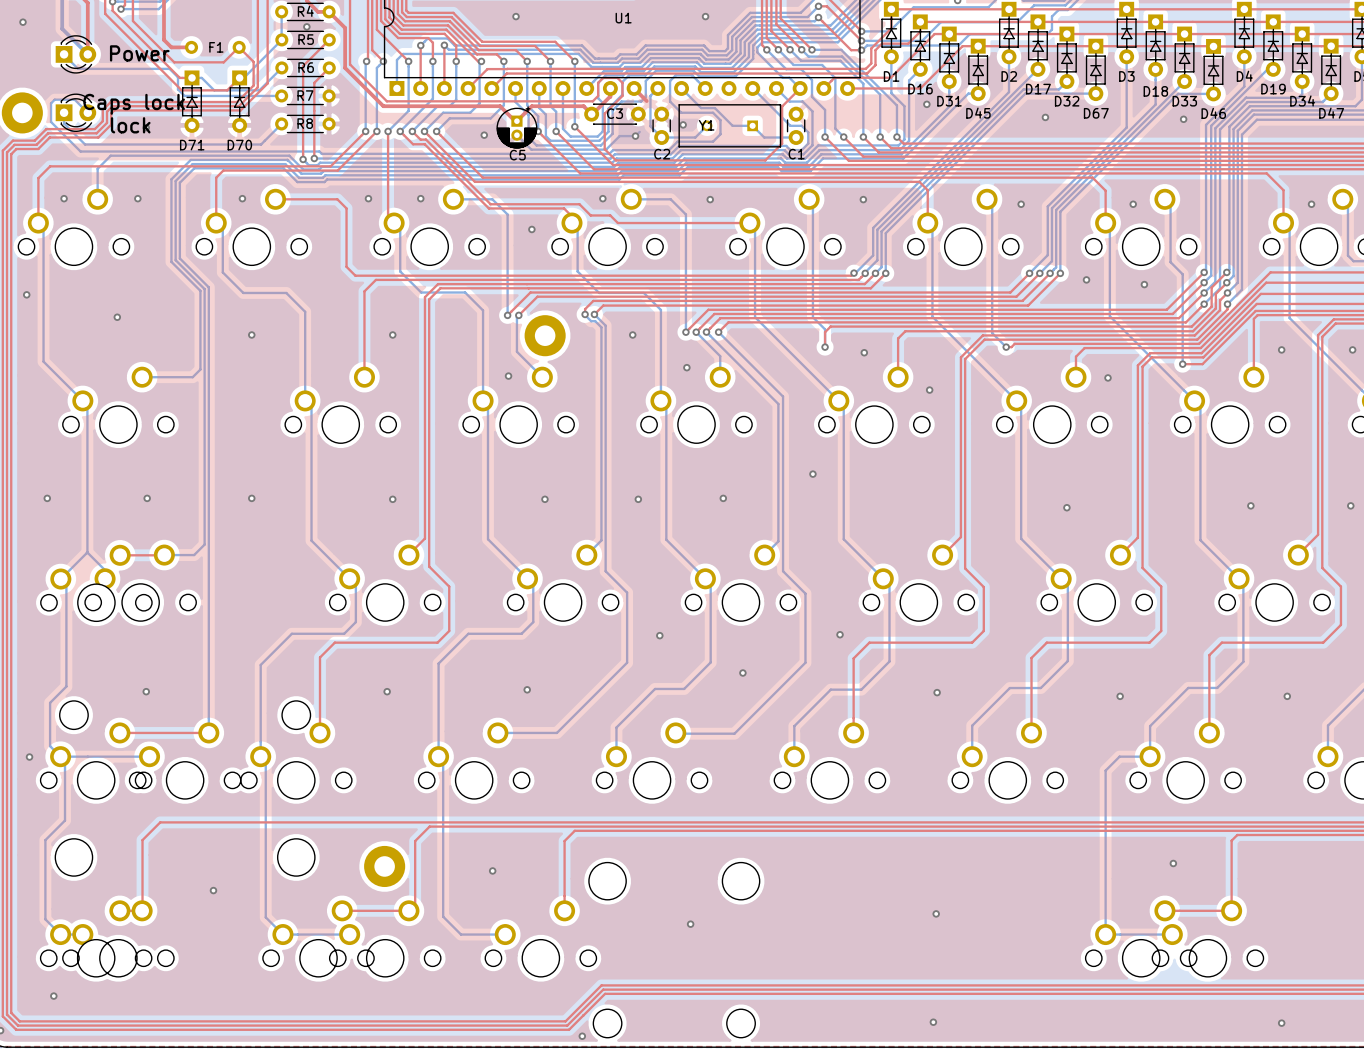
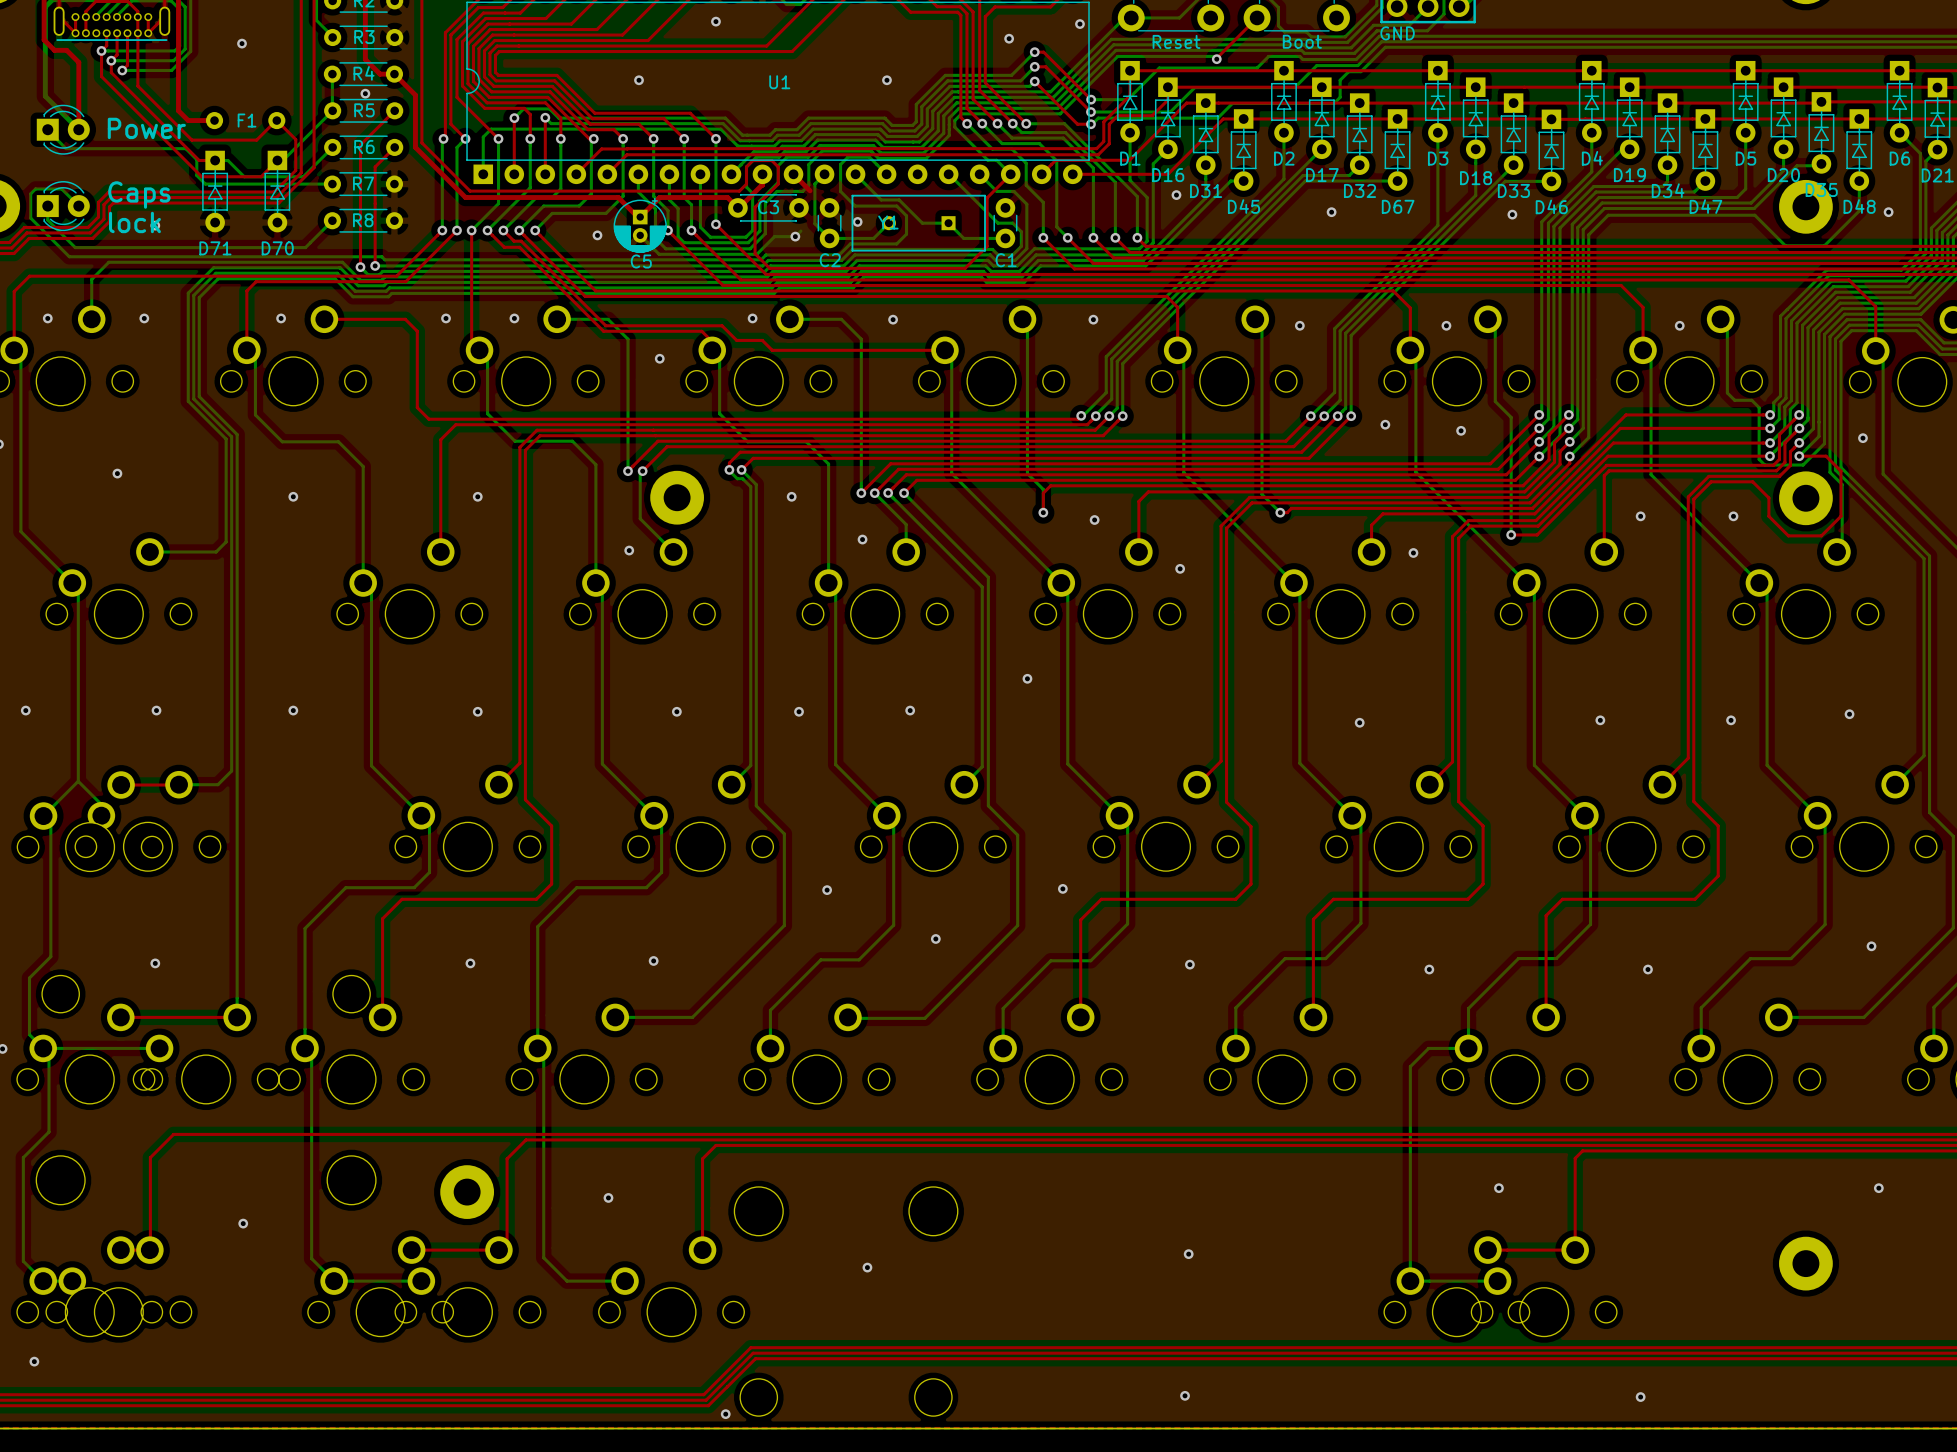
part value: Caps lock (134, 104) -> Caps (139, 195)

